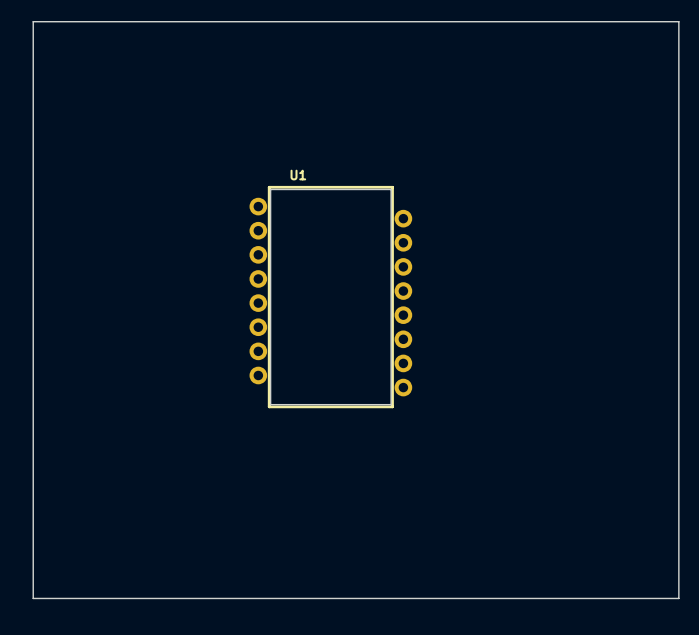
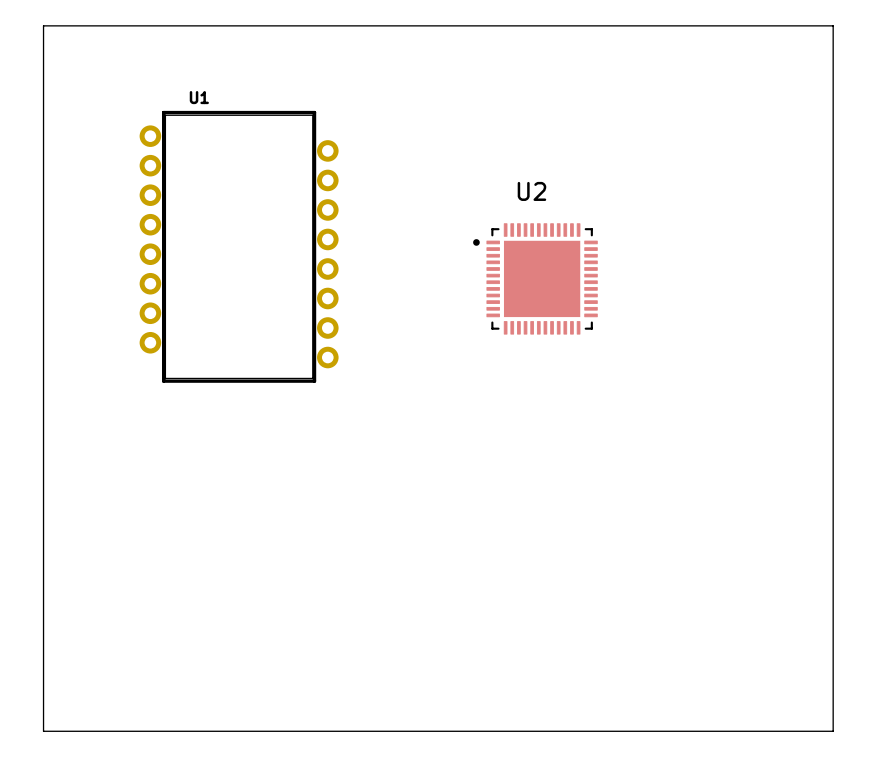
U2: none -> (535, 278)
U1 position: (330, 297) -> (239, 246)

